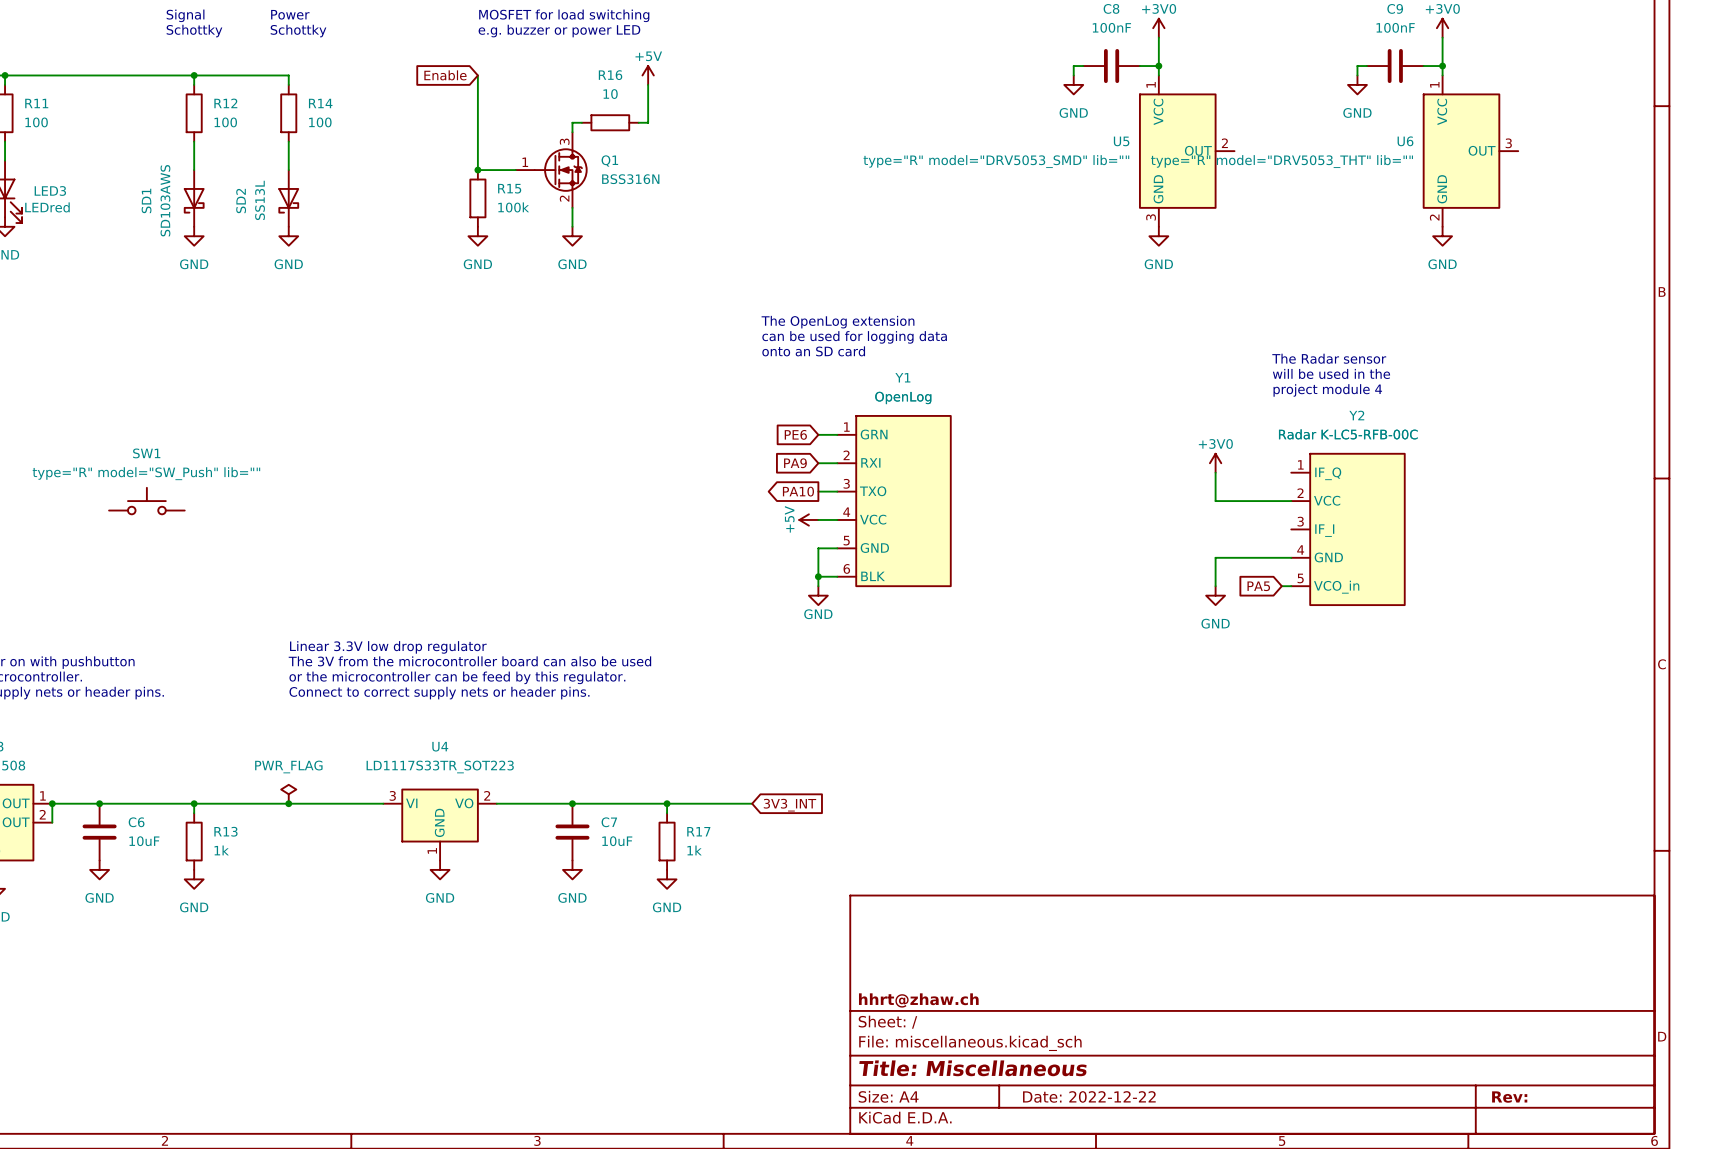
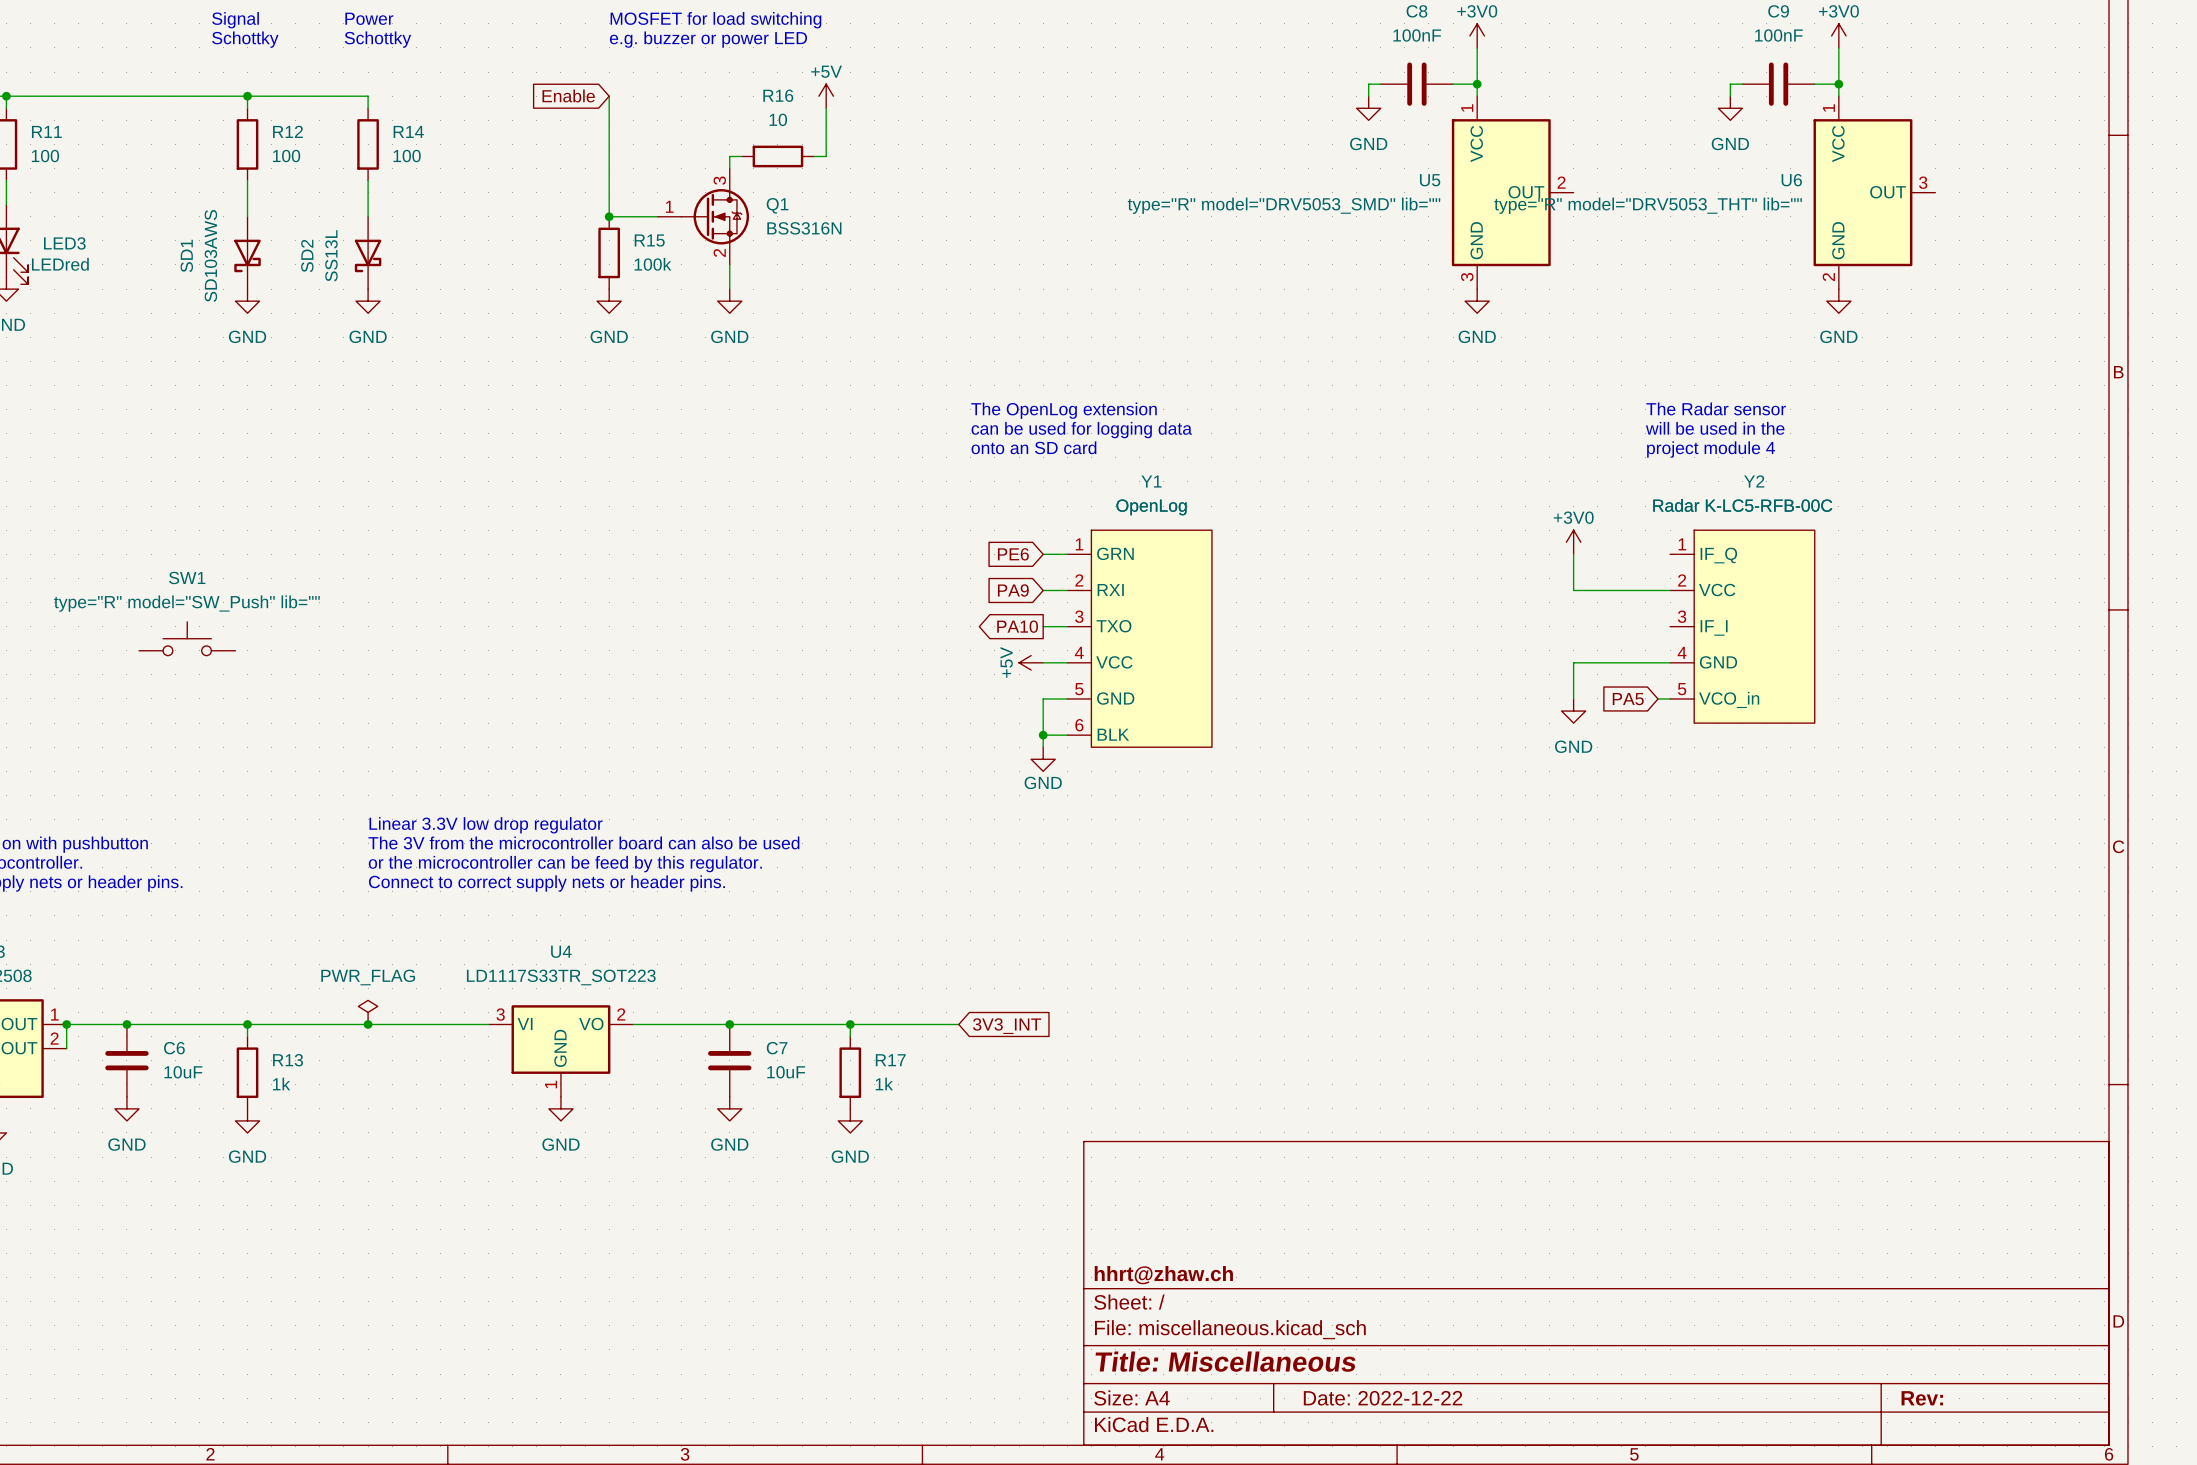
text position: The Radar sensor (1329, 358) -> The Radar sensor (1716, 408)
text position: will be used in the (1331, 373) -> will be used in the (1715, 428)
text position: project module 4 (1327, 390) -> project module 4 (1711, 449)
power symbol position: +3V0 (1215, 463) -> +3V0 (1573, 542)
wire: (1215, 472) (1215, 501) (1291, 501) -> (1573, 554) (1573, 590) (1670, 590)
Y2 position: (1348, 529) -> (1742, 626)
wire: (1291, 557) (1215, 557) (1215, 586) -> (1670, 662) (1573, 662) (1573, 698)
global label position: PA5 (1258, 586) -> PA5 (1628, 699)
wire: (1281, 586) (1291, 586) -> (1658, 698) (1670, 698)
power symbol position: GND (1215, 595) -> GND (1573, 711)

